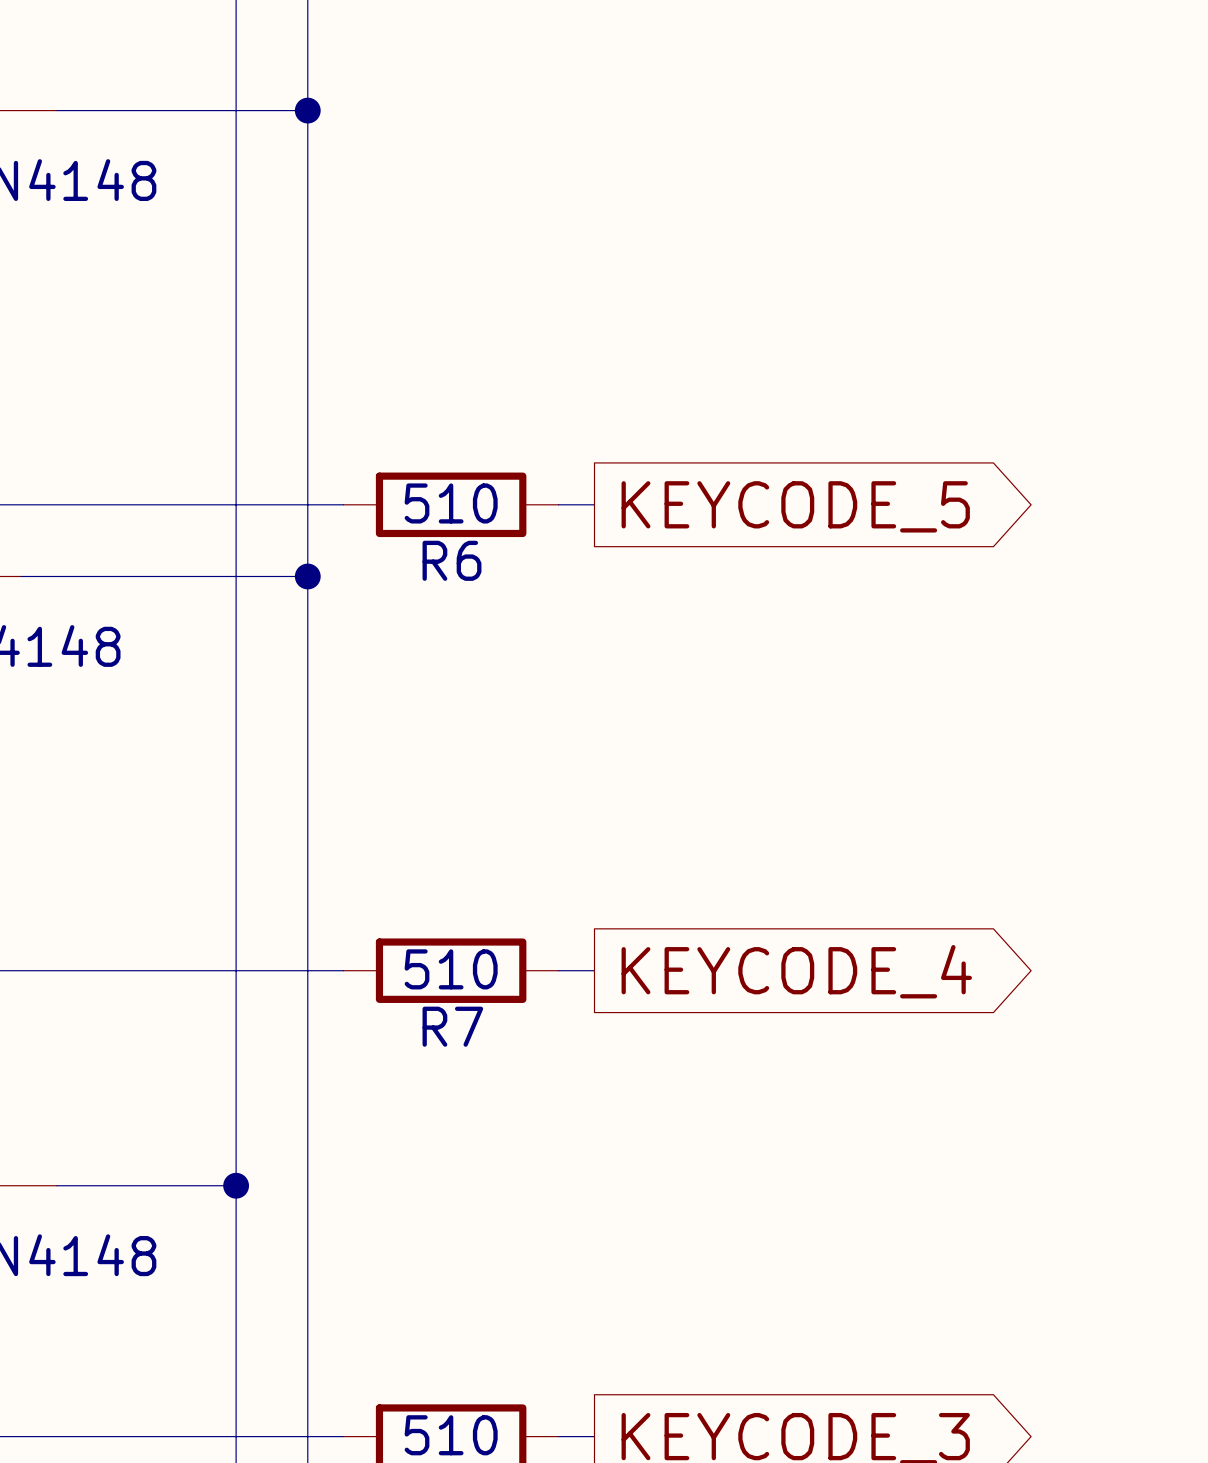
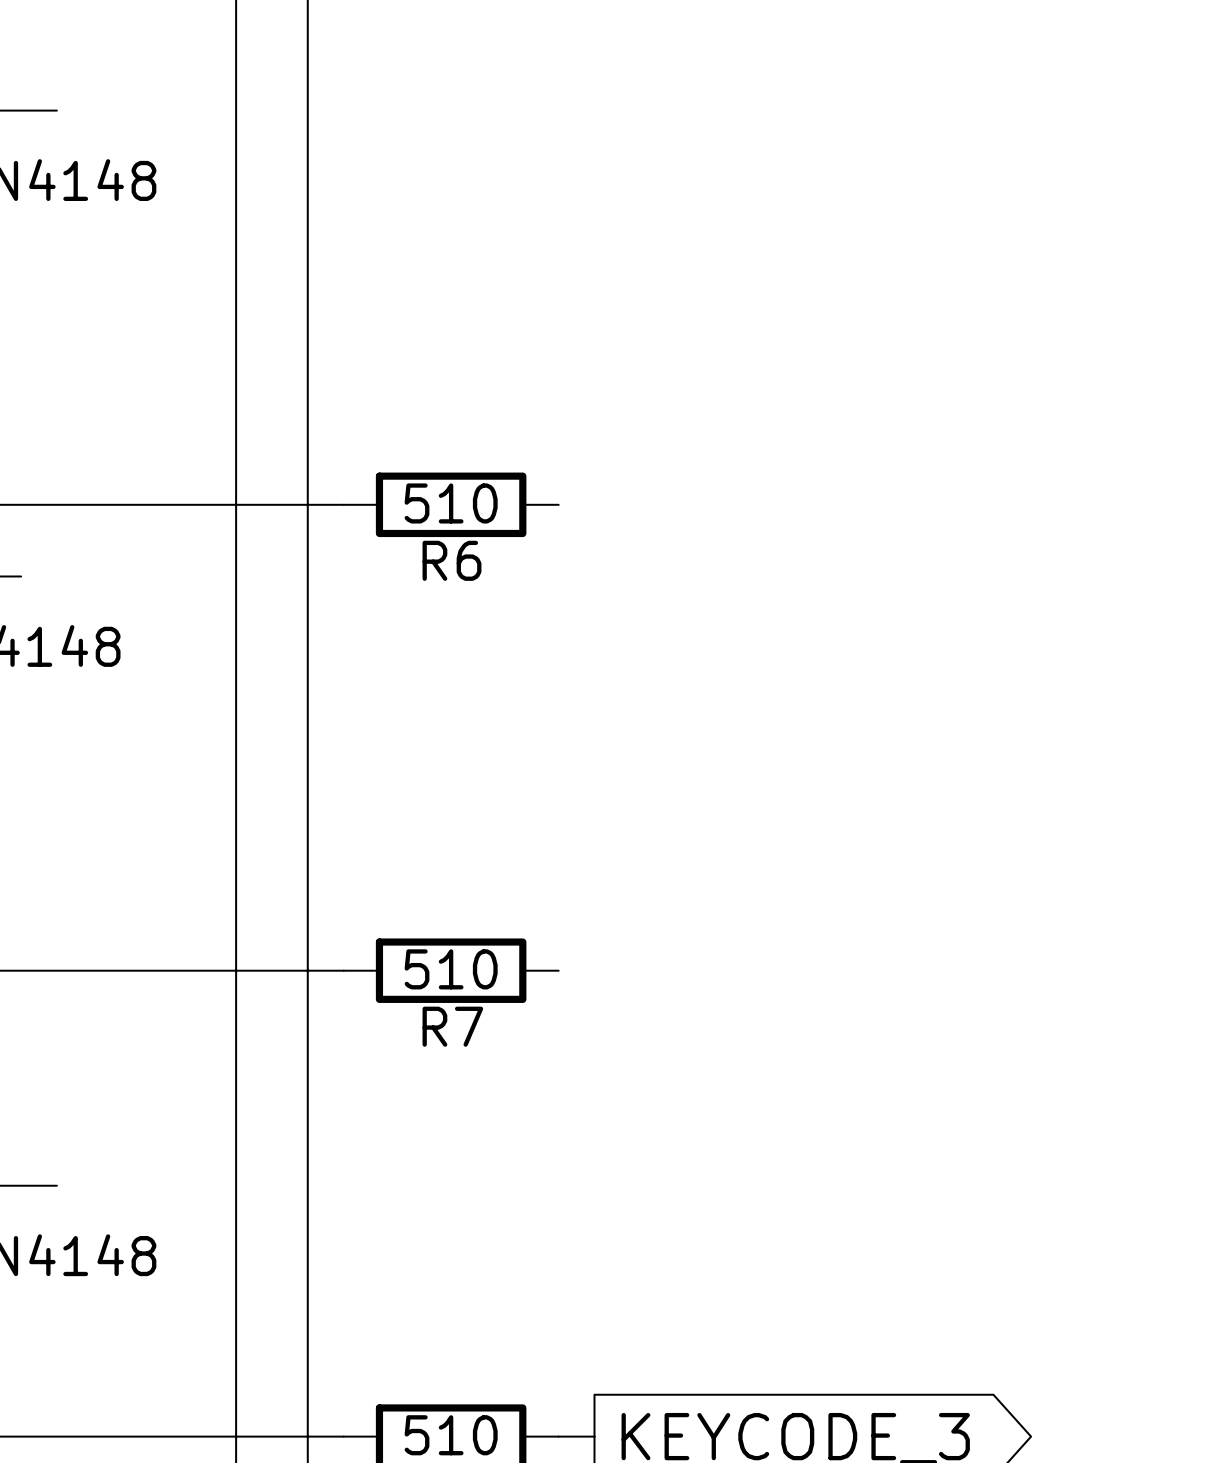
wire: (56, 110) (307, 110) -> none
junction: (307, 110) -> none
wire: (558, 504) (594, 504) -> none
global label: KEYCODE_5 (795, 506) -> none
wire: (21, 576) (307, 576) -> none
junction: (307, 576) -> none
wire: (558, 970) (594, 970) -> none
global label: KEYCODE_4 (796, 971) -> none
wire: (56, 1185) (236, 1185) -> none
junction: (236, 1185) -> none

